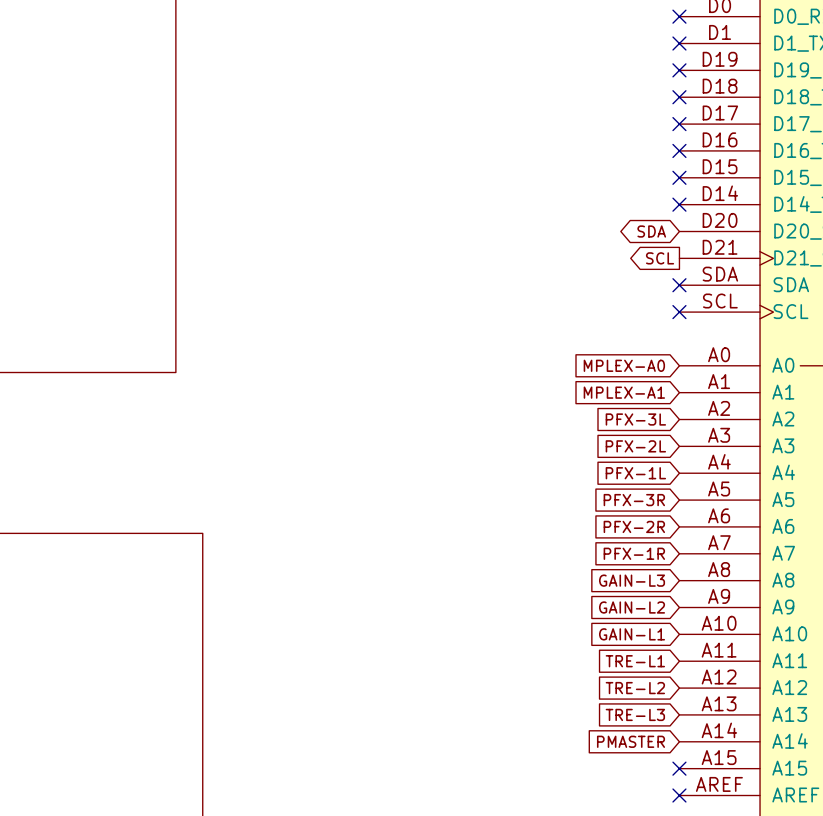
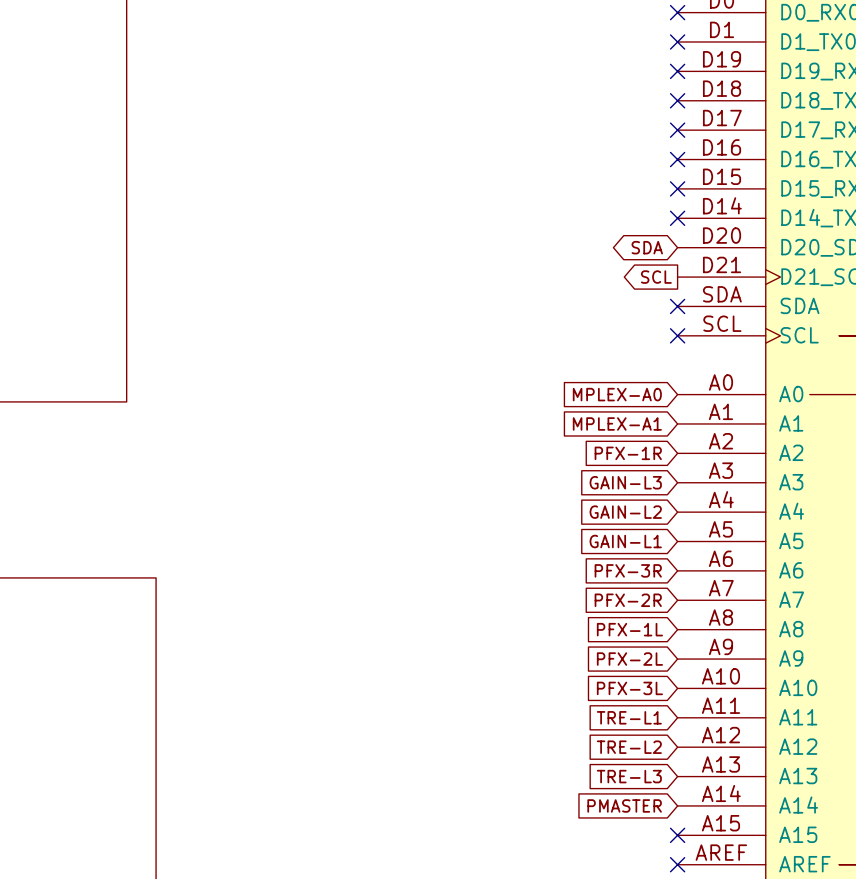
global label: PFX-3L (635, 419) -> PFX-1R (628, 453)
global label: PFX-2L (635, 446) -> GAIN-L3 (625, 482)
global label: PFX-1L (635, 473) -> GAIN-L2 (625, 512)
global label: PFX-3R (634, 500) -> GAIN-L1 (625, 541)
global label: PFX-2R (634, 526) -> PFX-3R (628, 570)
global label: PFX-1R (634, 553) -> PFX-2R (628, 600)
global label: GAIN-L3 (632, 580) -> PFX-1L (629, 629)
global label: GAIN-L2 (632, 607) -> PFX-2L (629, 659)
global label: GAIN-L1 (632, 634) -> PFX-3L (629, 688)

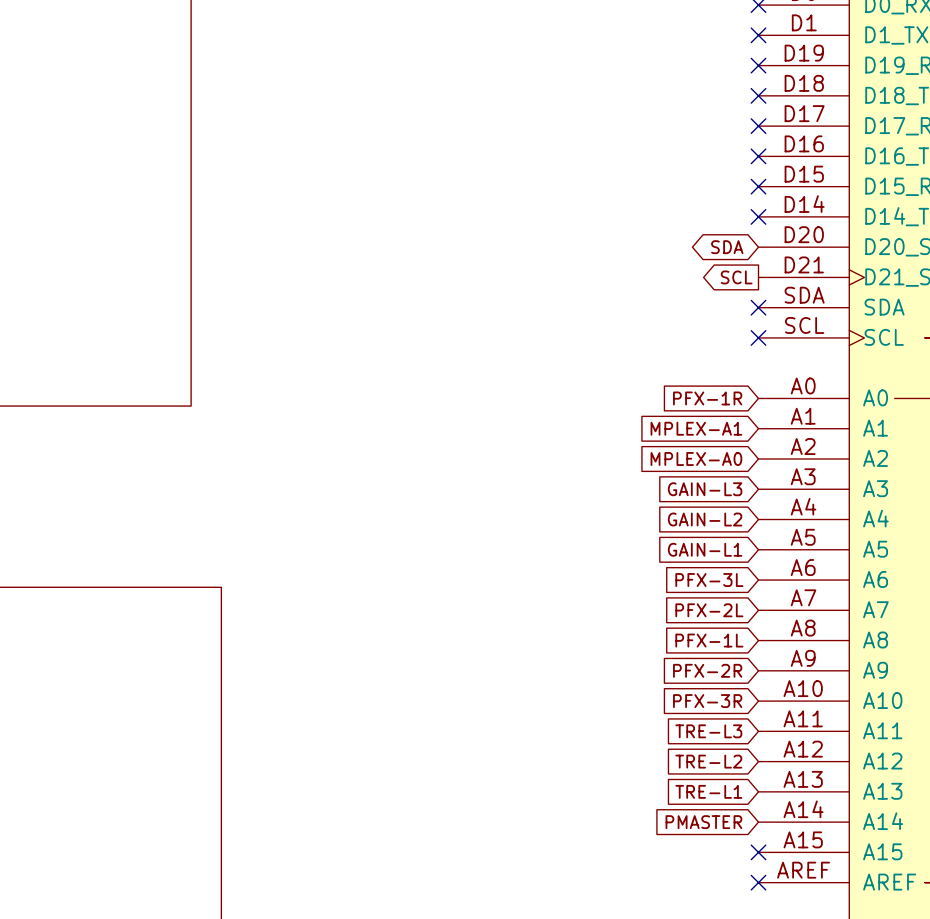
global label: MPLEX-A0 (617, 394) -> PFX-1R (707, 398)
global label: PFX-1R (628, 453) -> MPLEX-A0 (696, 458)
global label: PFX-3R (628, 570) -> PFX-3L (709, 580)
global label: PFX-2R (628, 600) -> PFX-2L (709, 610)
global label: PFX-2L (629, 659) -> PFX-2R (707, 670)
global label: PFX-3L (629, 688) -> PFX-3R (707, 701)
global label: TRE-L1 (629, 717) -> TRE-L3 (708, 731)
global label: TRE-L3 (629, 776) -> TRE-L1 (708, 791)

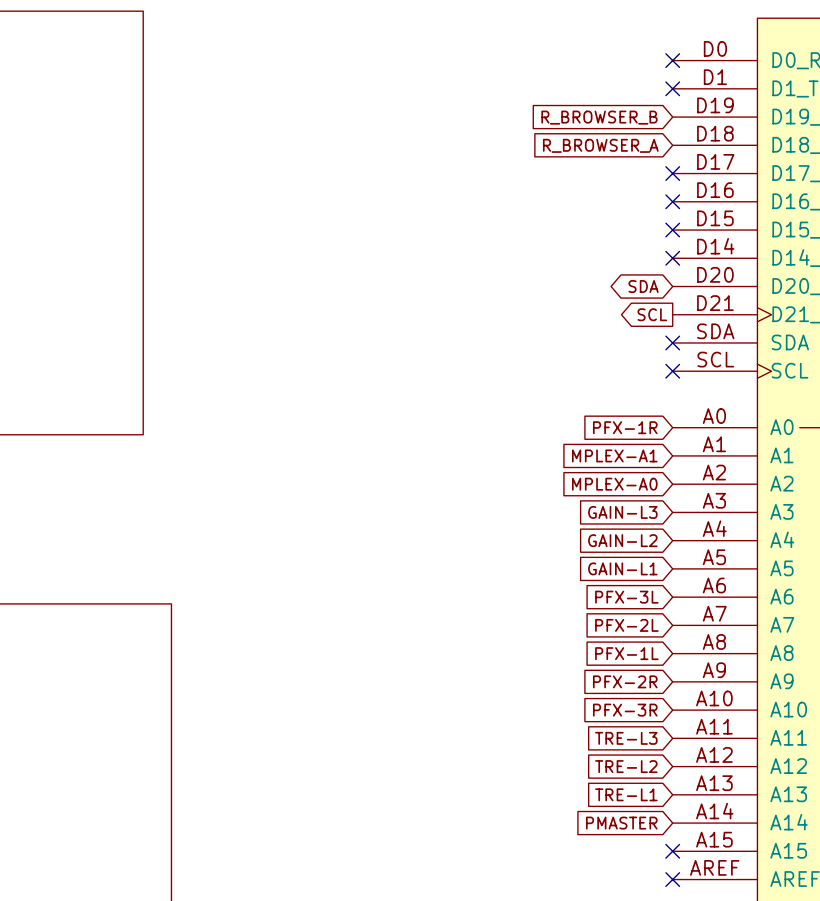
no-connect mark: (758, 65) -> none
global label: none -> R_BROWSER_B (599, 117)
no-connect mark: (758, 95) -> none
global label: none -> R_BROWSER_A (600, 145)

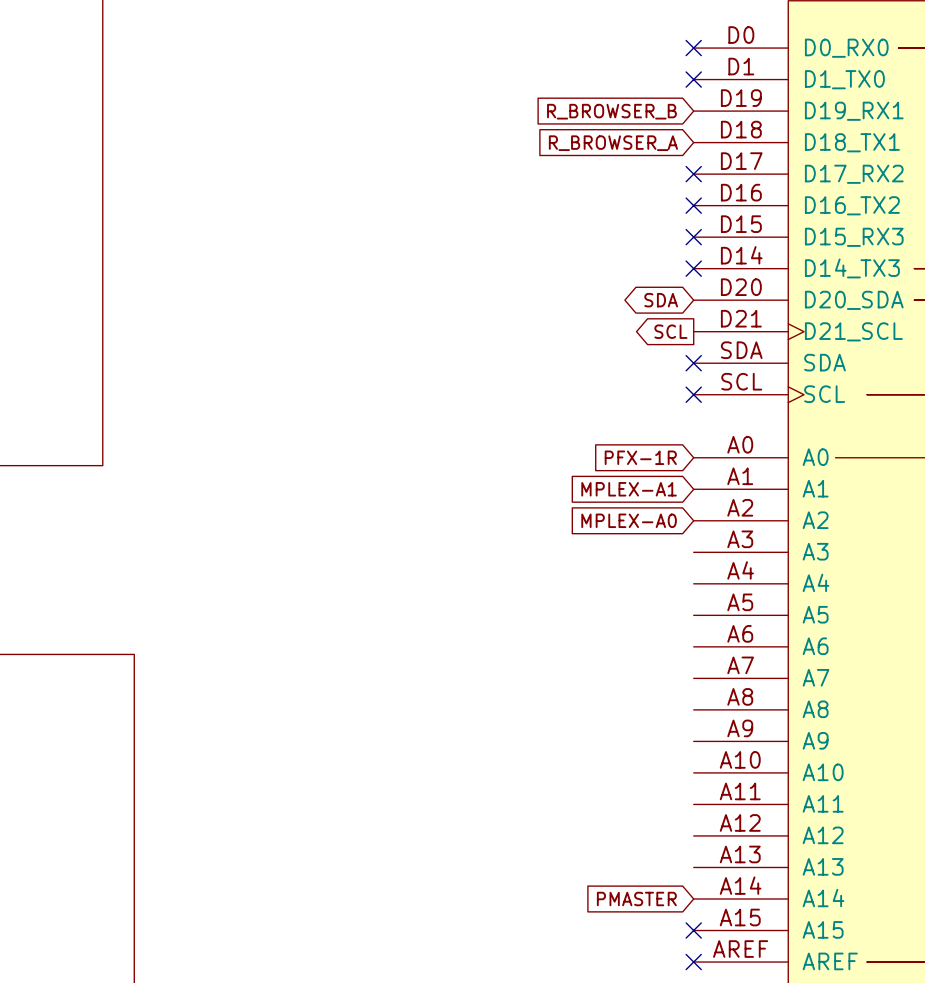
global label: GAIN-L3 (622, 512) -> none
global label: GAIN-L2 (622, 540) -> none
global label: GAIN-L1 (622, 568) -> none
global label: PFX-3L (626, 597) -> none
global label: PFX-2L (626, 625) -> none
global label: PFX-1L (626, 653) -> none
global label: PFX-2R (625, 681) -> none
global label: PFX-3R (625, 710) -> none
global label: TRE-L3 (626, 738) -> none
global label: TRE-L2 (626, 766) -> none
global label: TRE-L1 (626, 794) -> none

